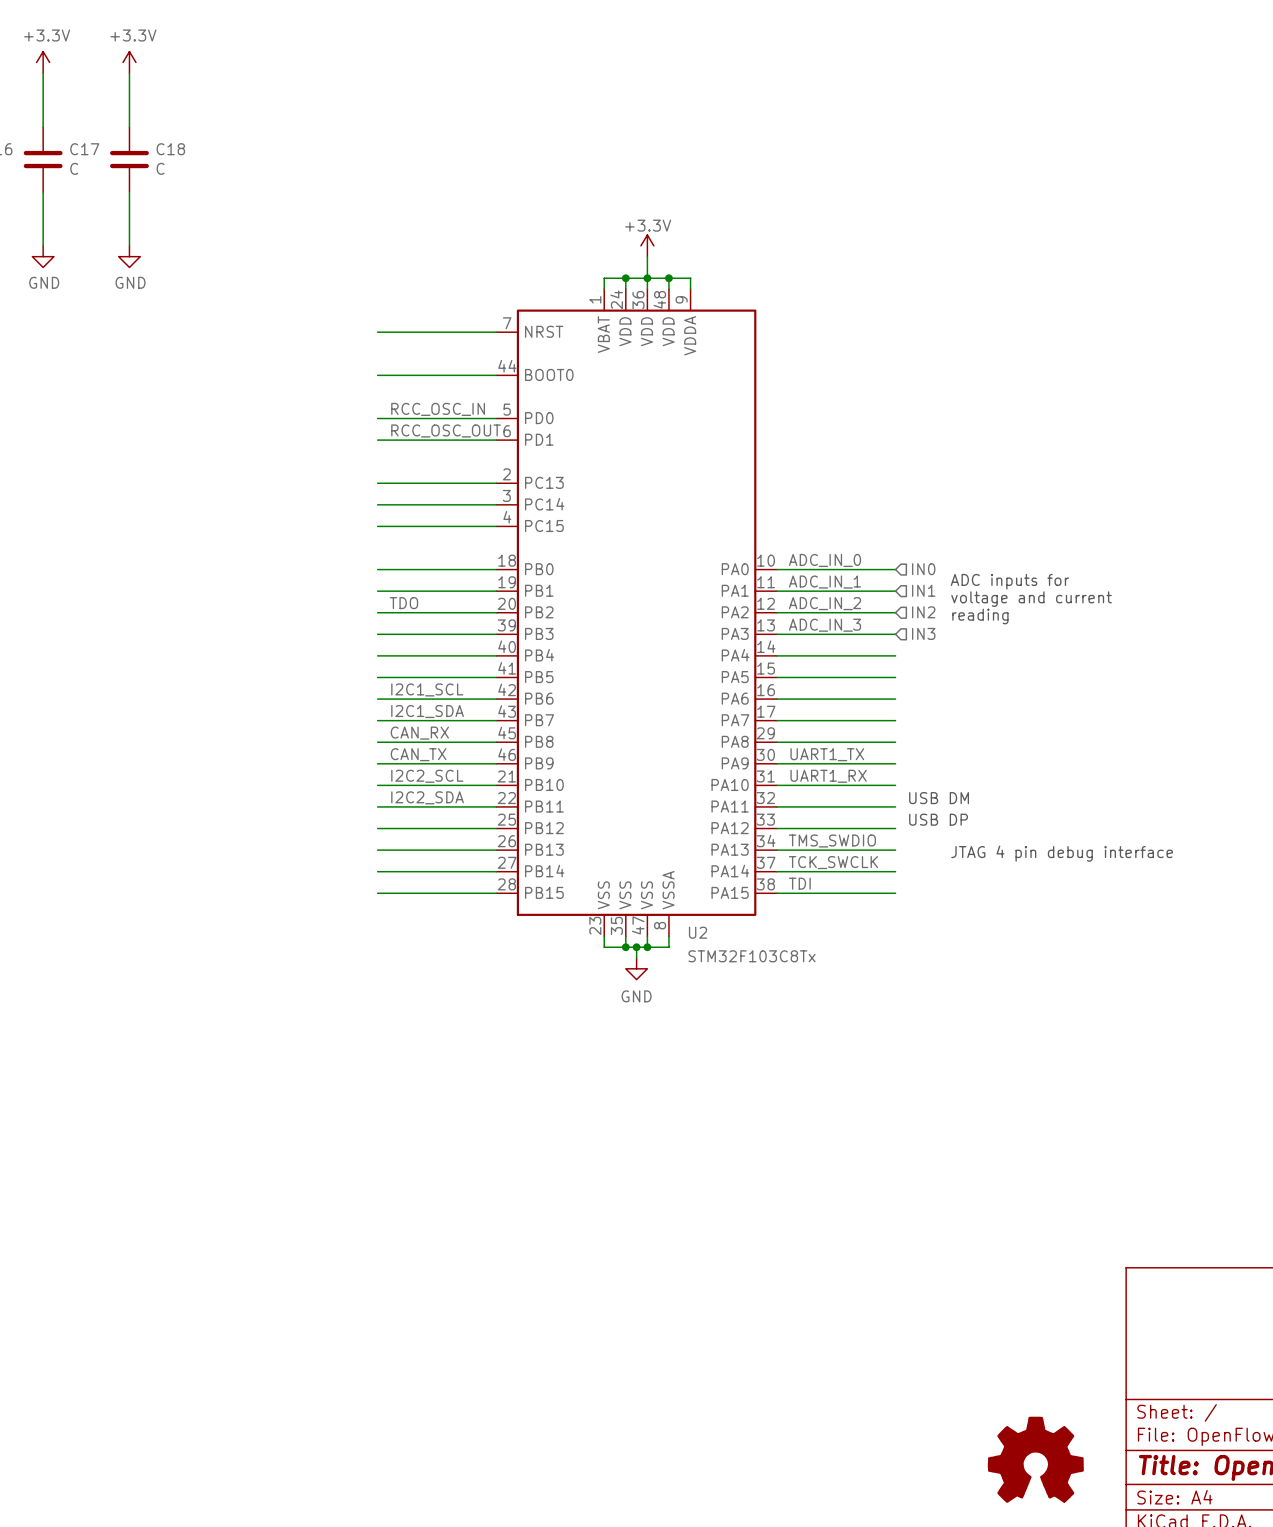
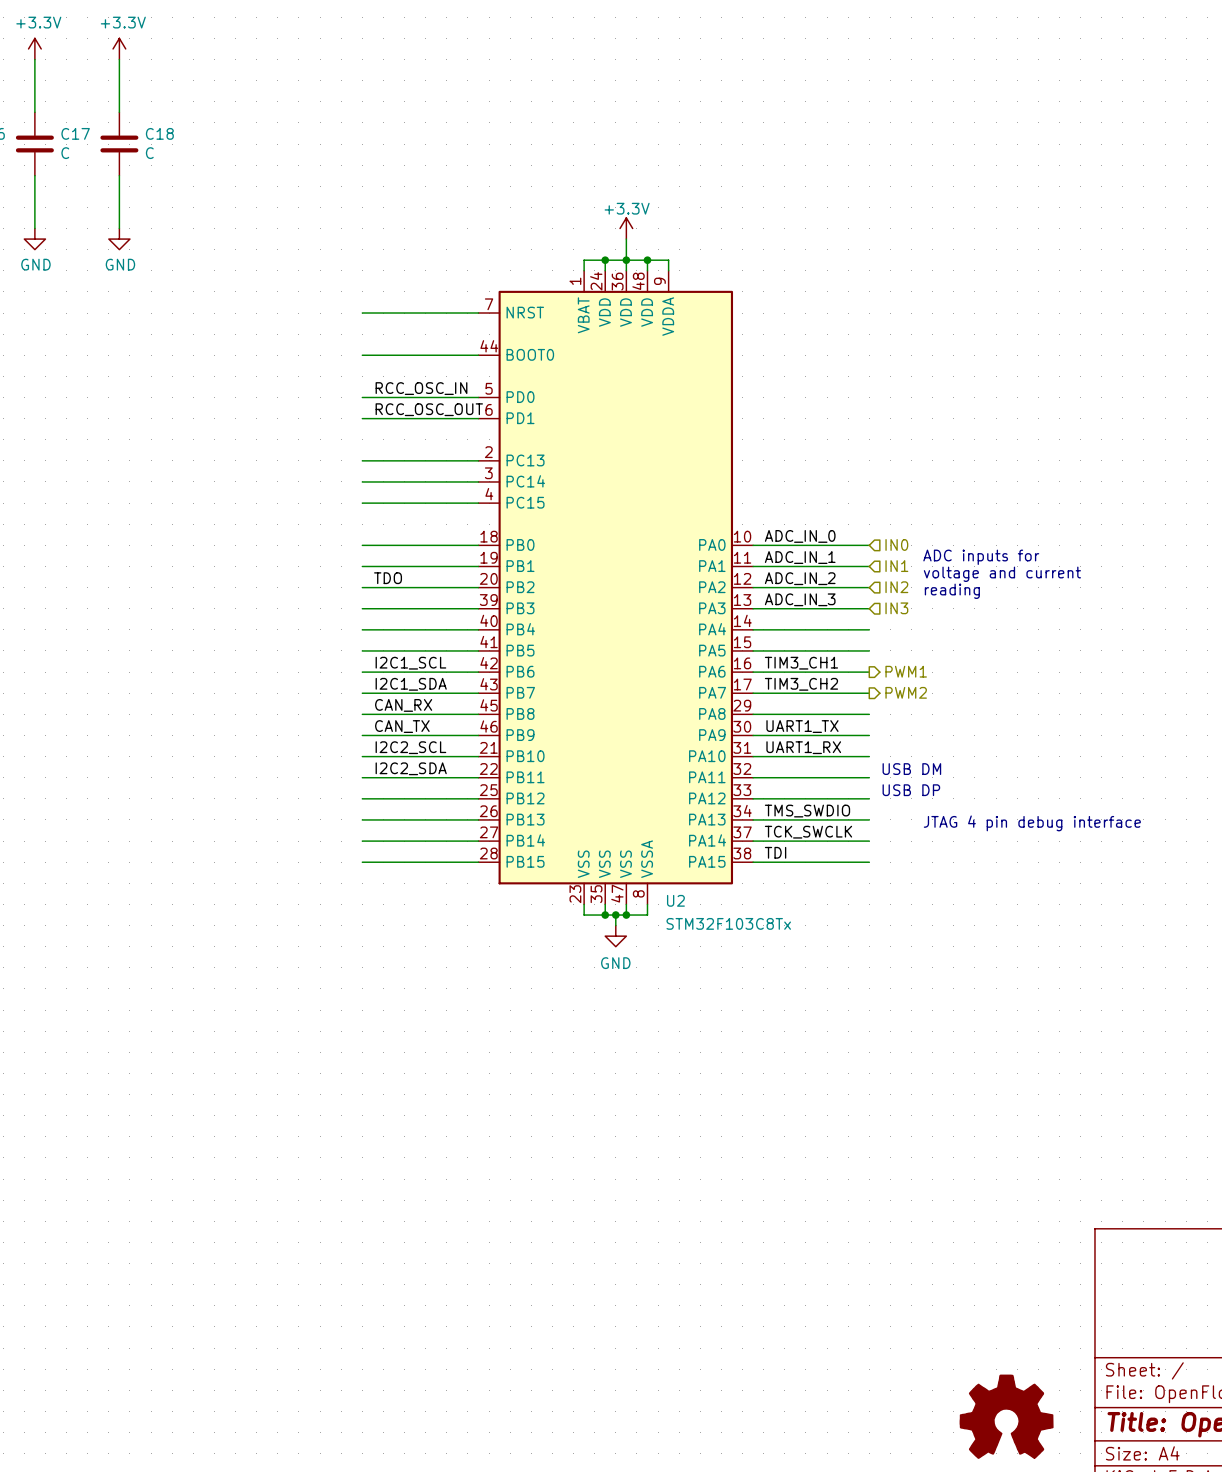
label: none -> TIM3_CH1 (801, 663)
hierarchical label: none -> PWM1 (906, 671)
label: none -> TIM3_CH2 (801, 684)
hierarchical label: none -> PWM2 (906, 692)

